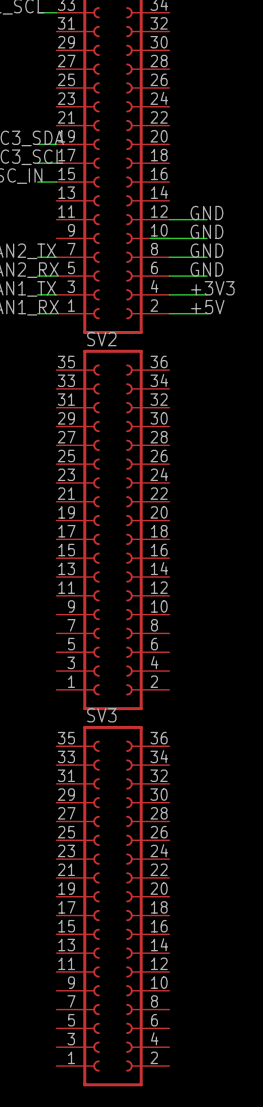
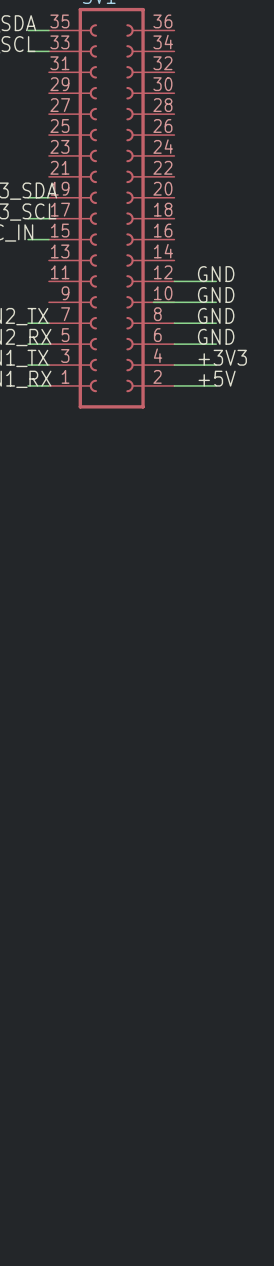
SV2: (112, 529) -> none
SV3: (112, 906) -> none

